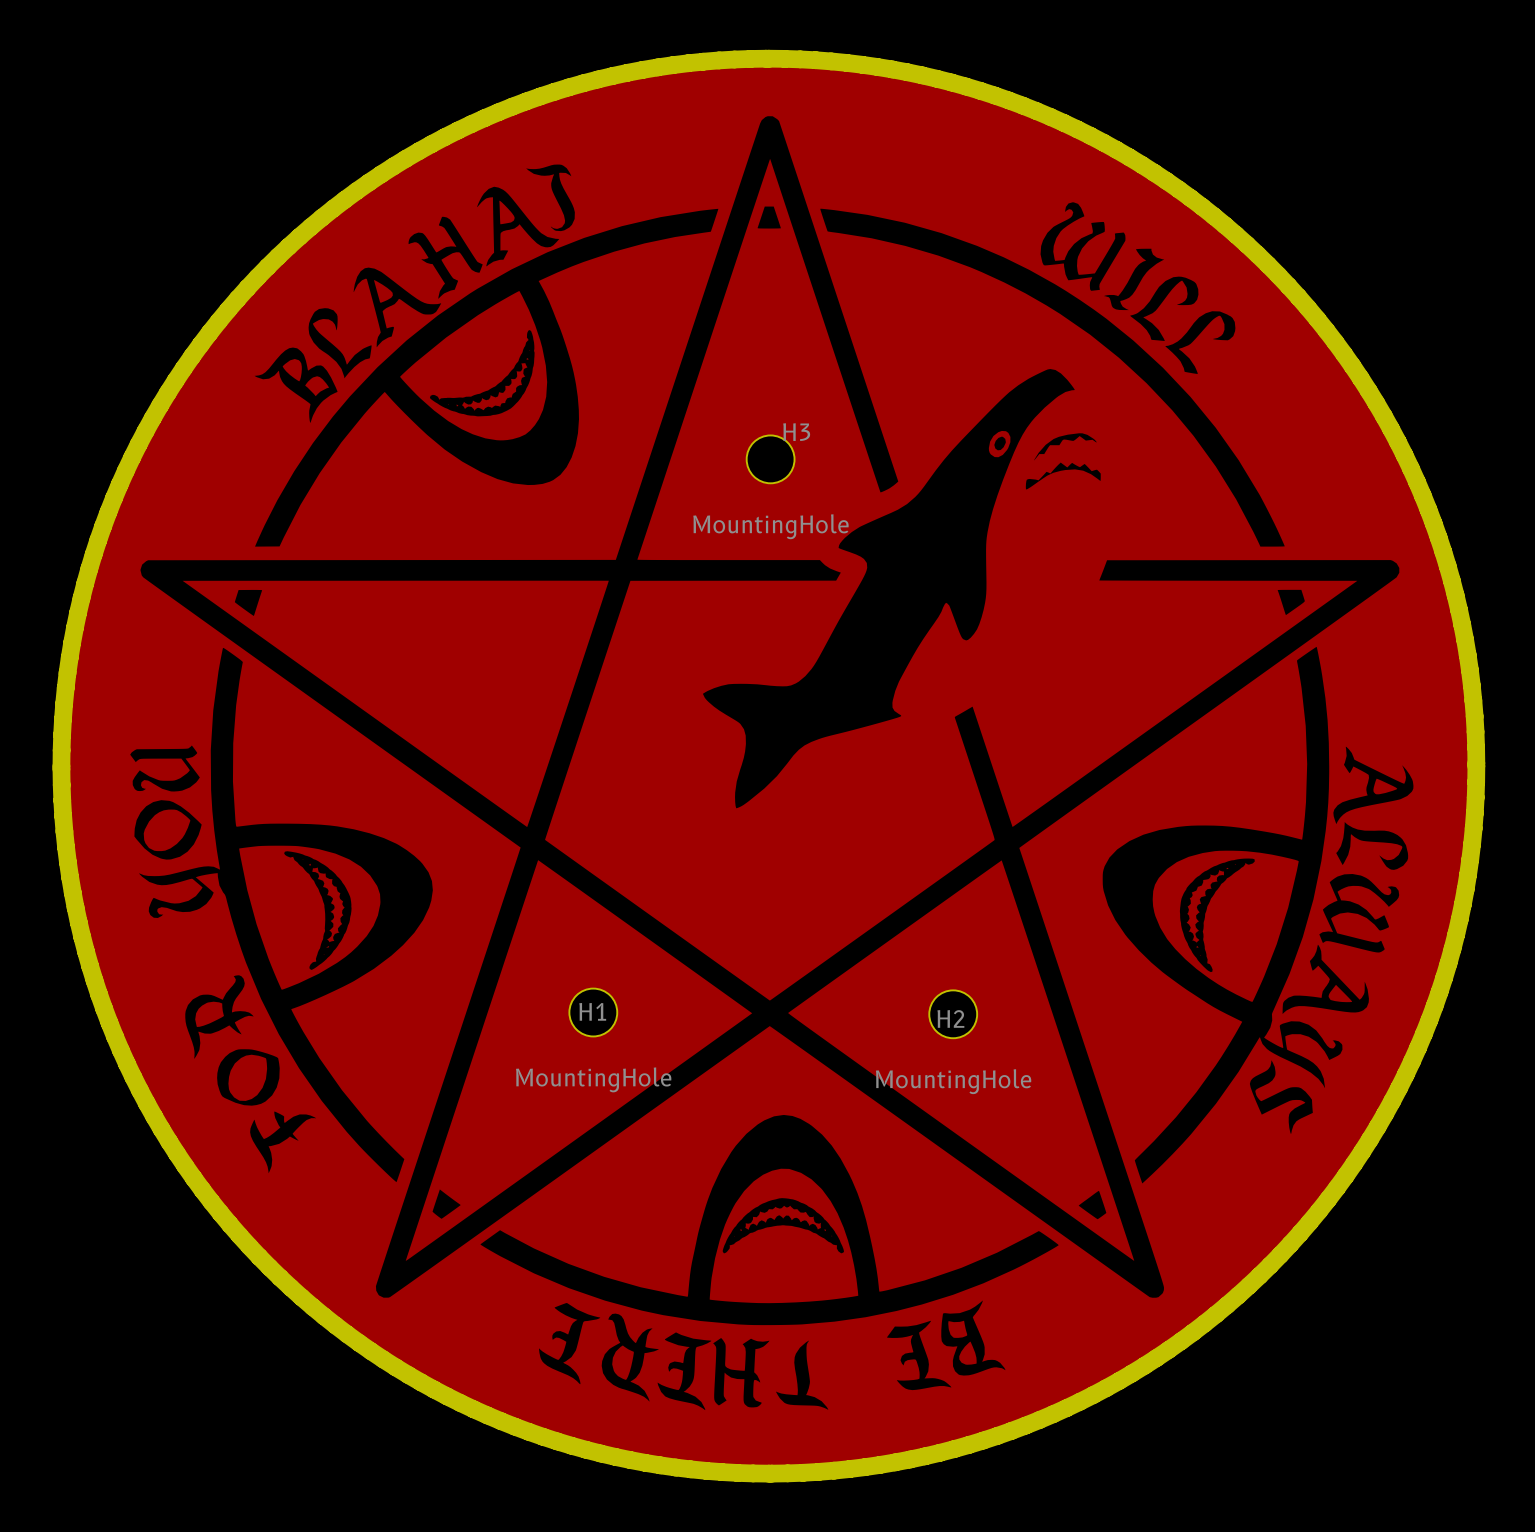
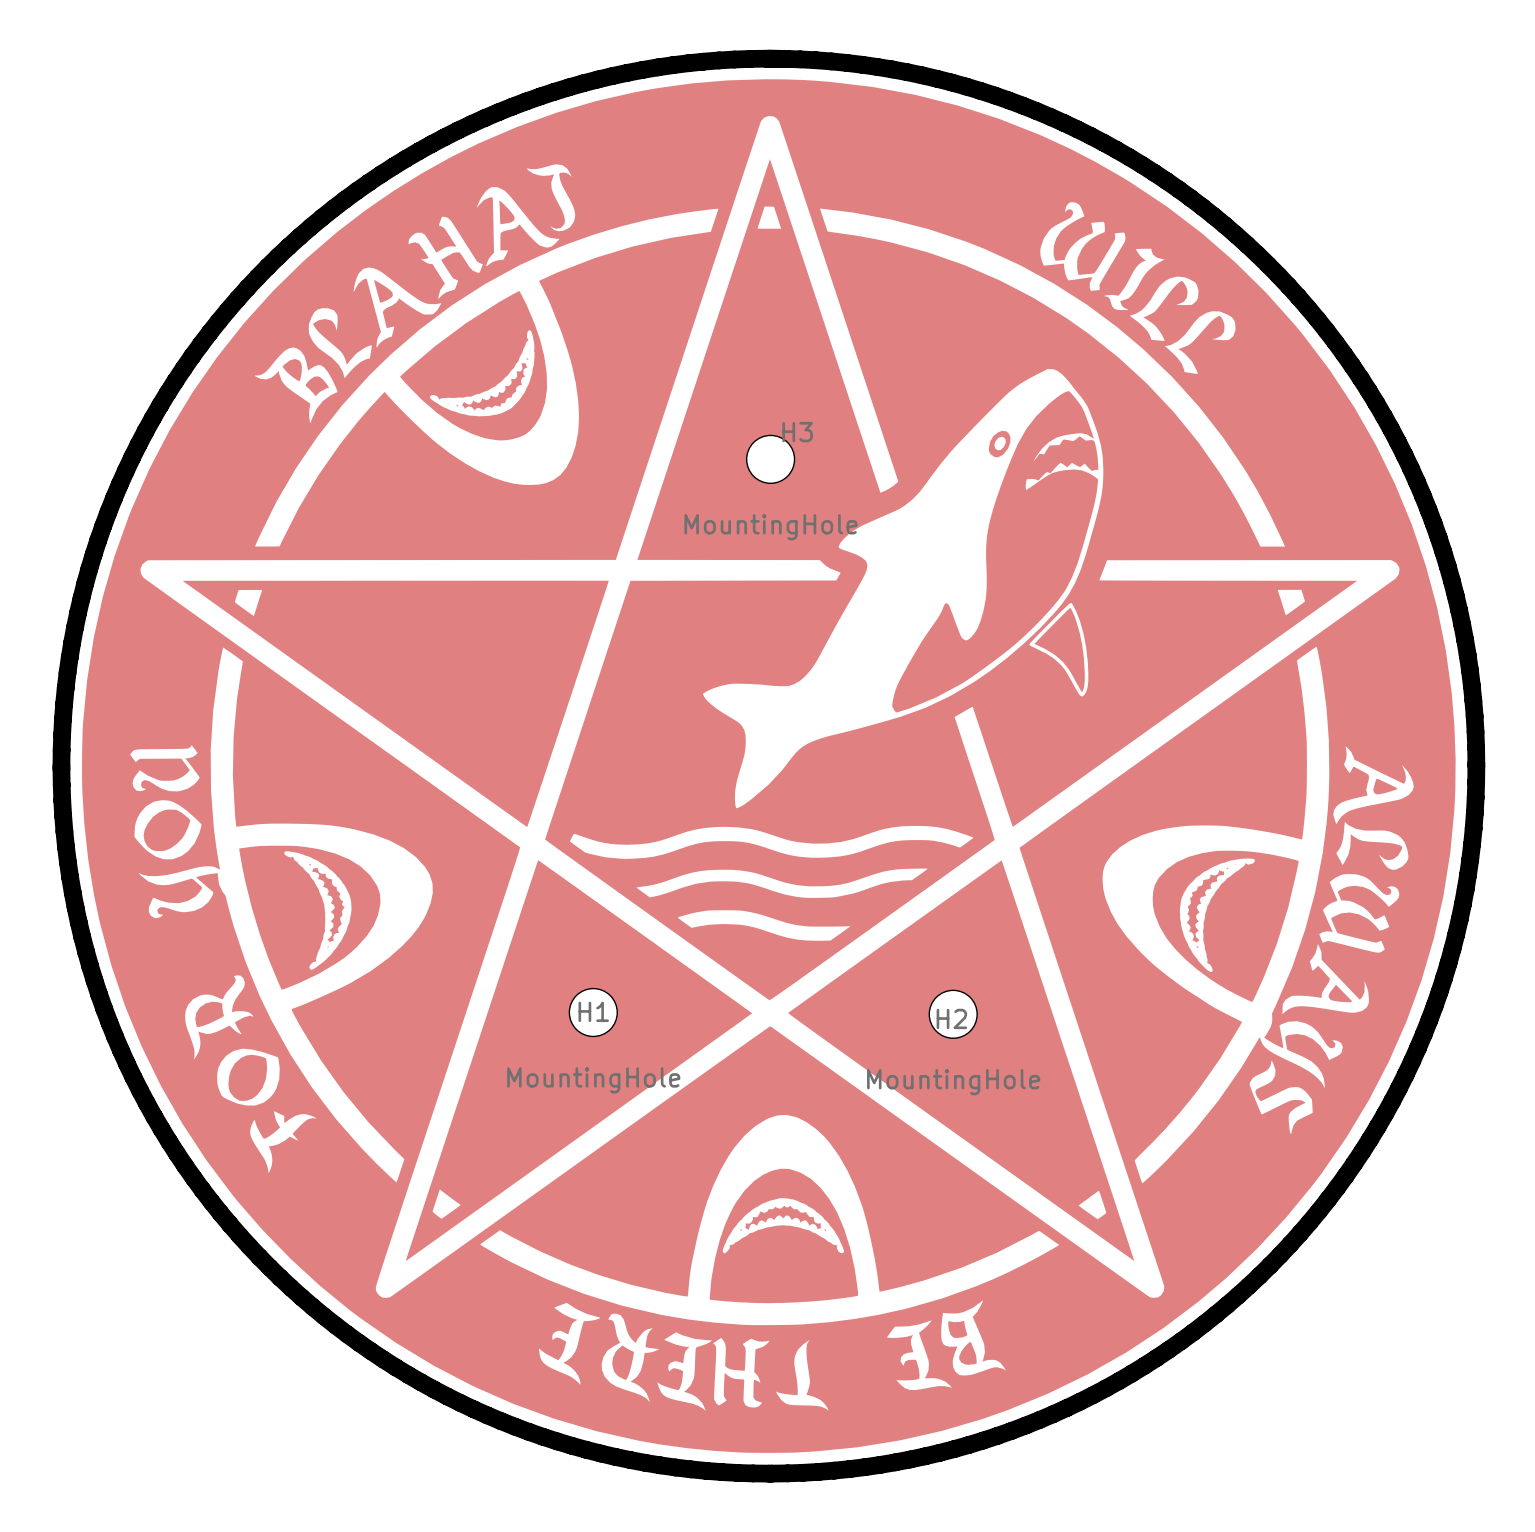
drawing shape: [61, 59, 1476, 1473] -> [82, 79, 1456, 1453]

